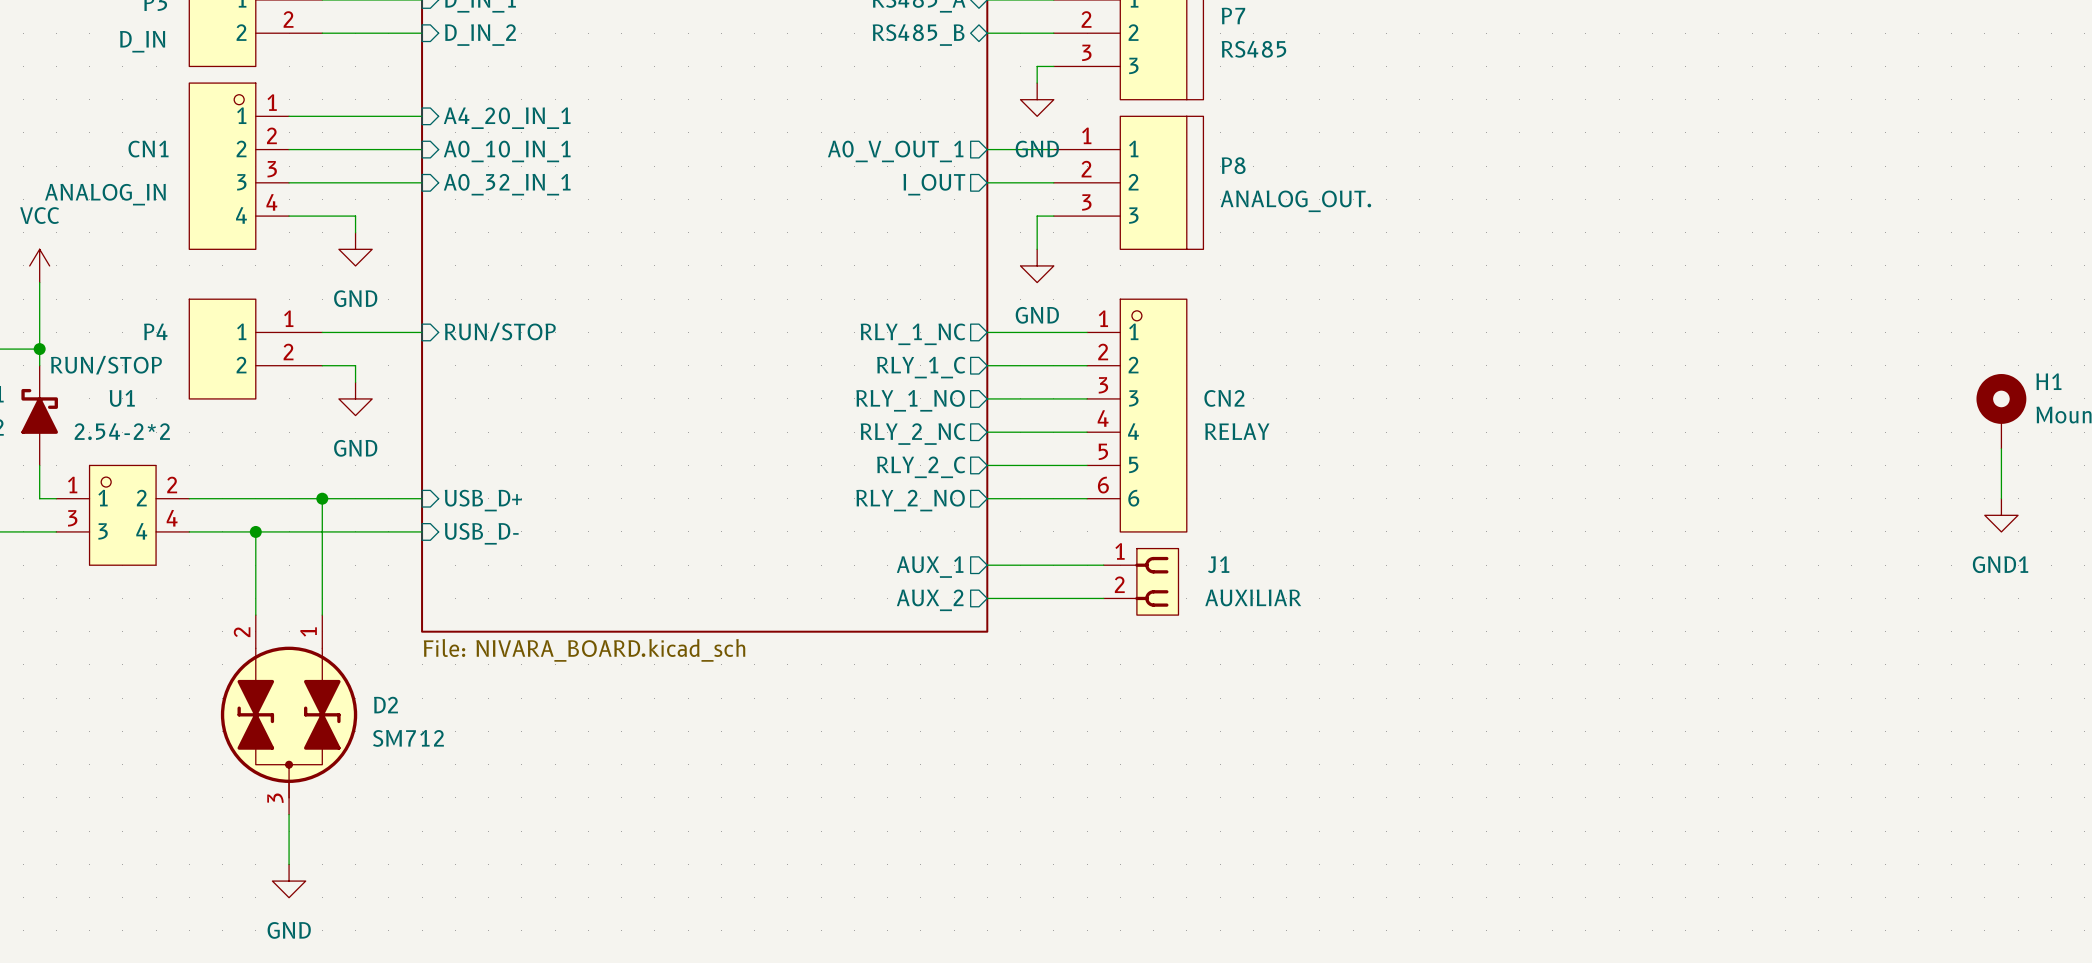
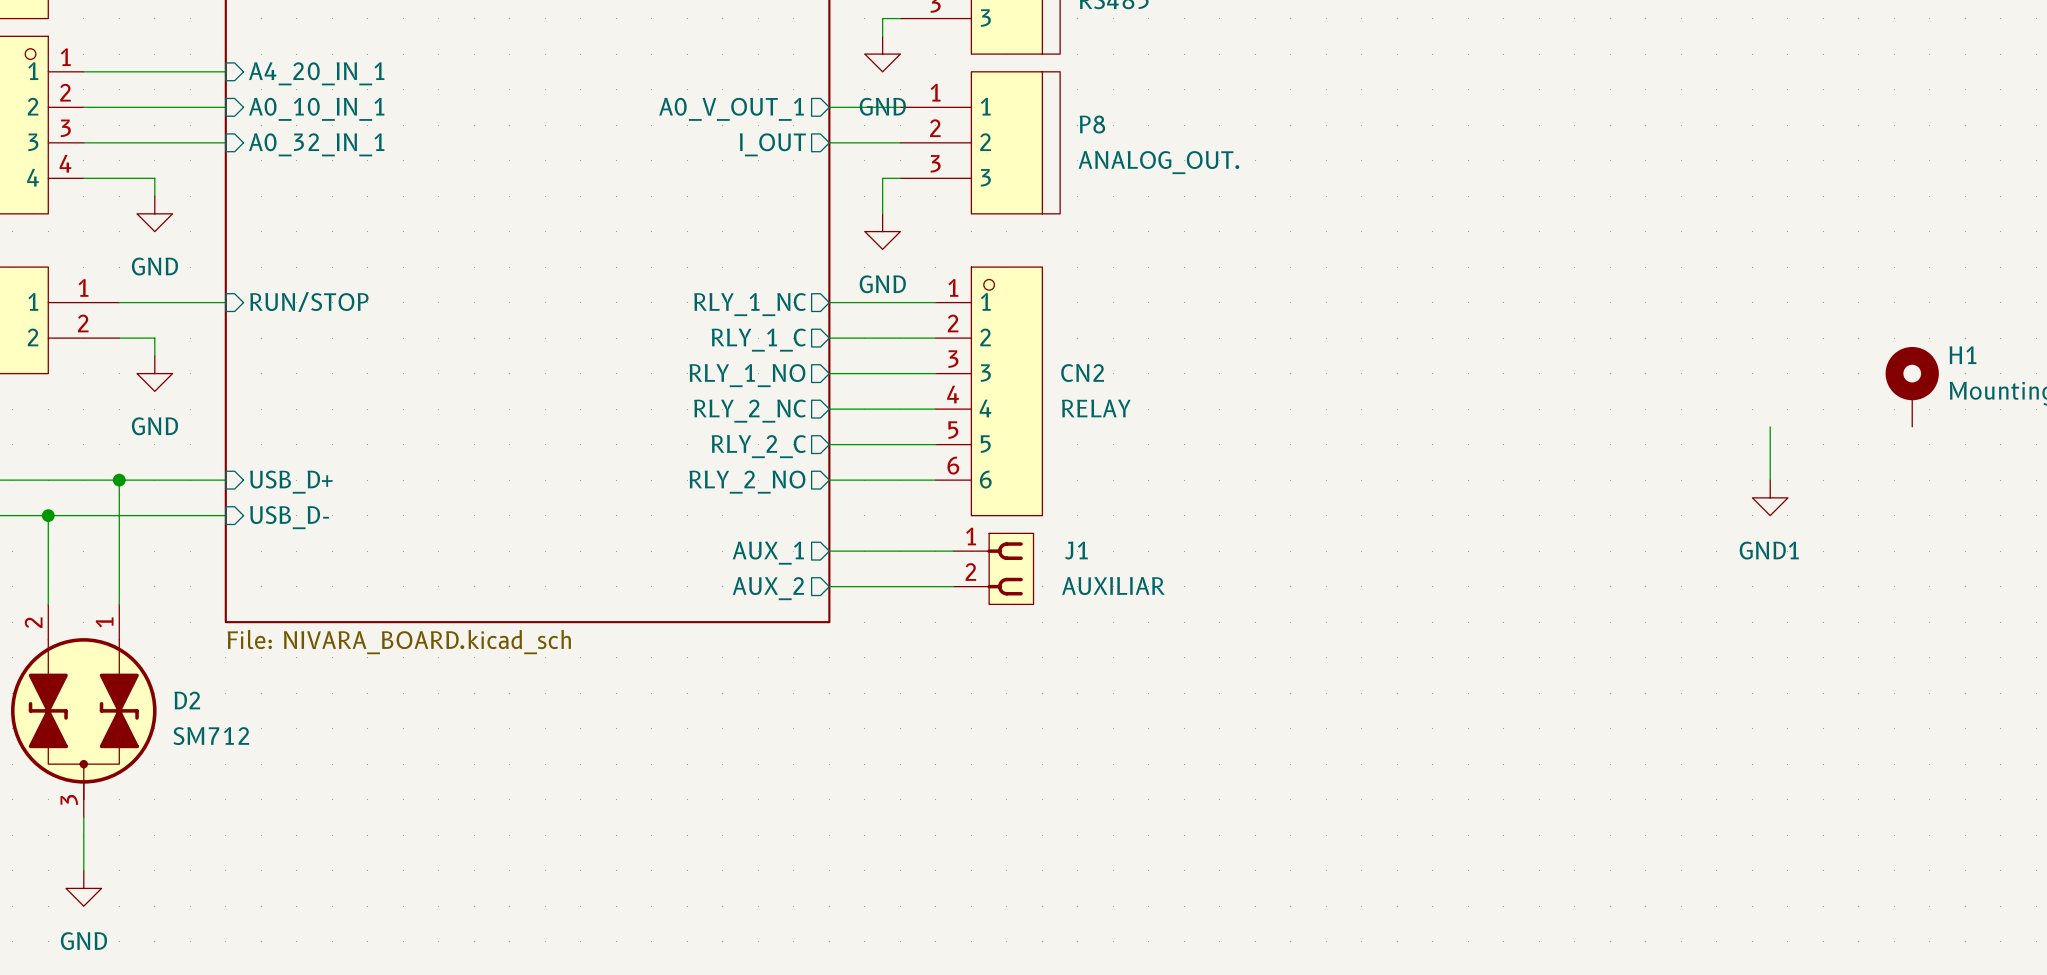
wire: (2001, 448) (2001, 498) -> (1770, 426) (1770, 480)
power symbol: none -> GND1 (1770, 497)
power symbol: GND1 (2001, 515) -> none

